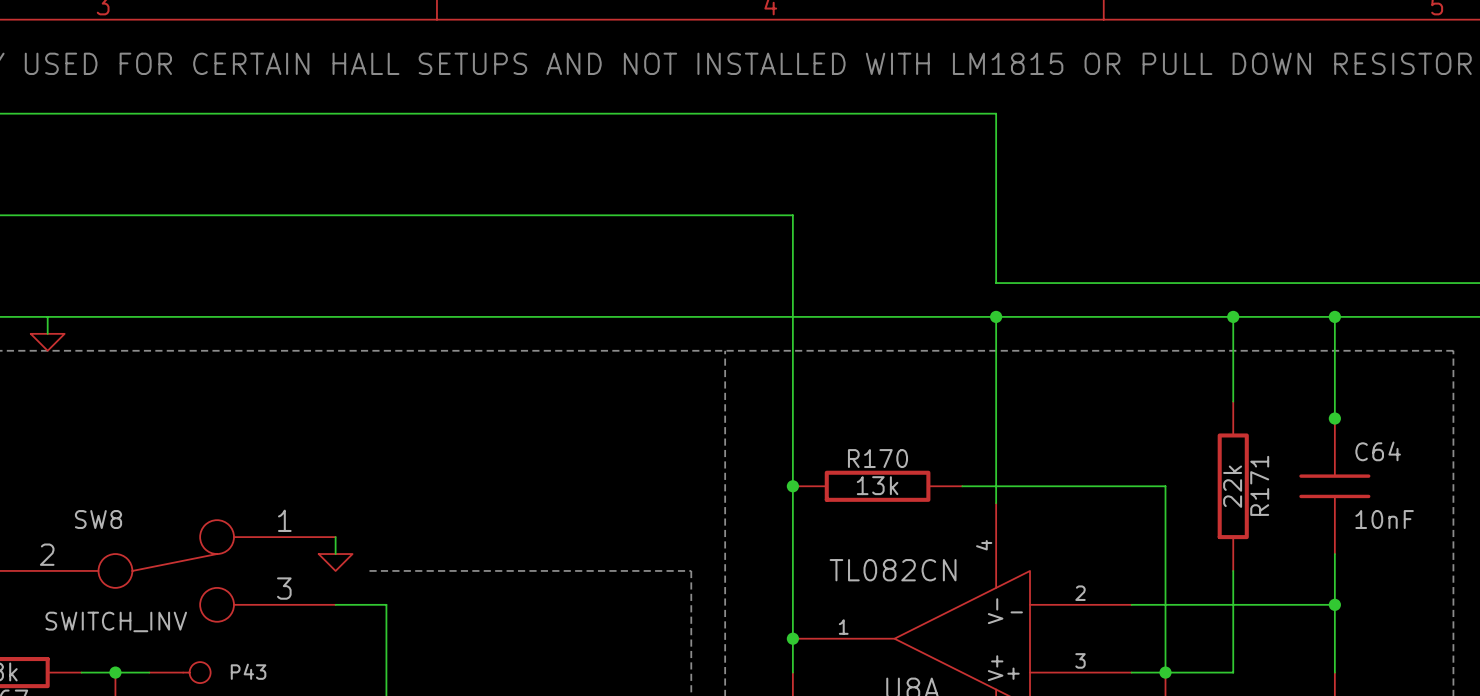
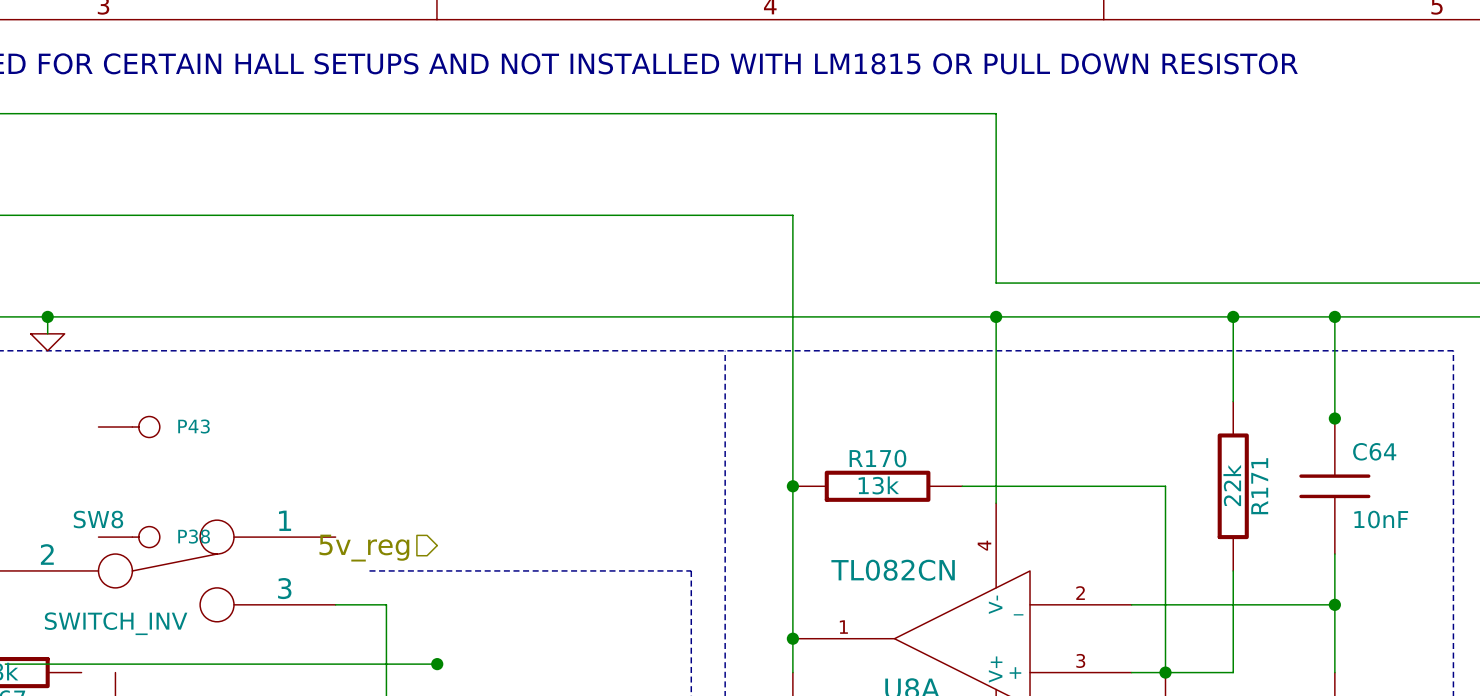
junction: none -> (47, 316)
P38: none -> (129, 537)
wire: (335, 537) (335, 554) -> none
hierarchical label: none -> 5v_reg (364, 548)
power symbol: (335, 562) -> none
wire: none -> (5, 664) (437, 664)
junction: none -> (437, 664)
wire: (81, 672) (149, 672) -> none
junction: (115, 672) -> none
P43 position: (179, 672) -> (129, 427)

